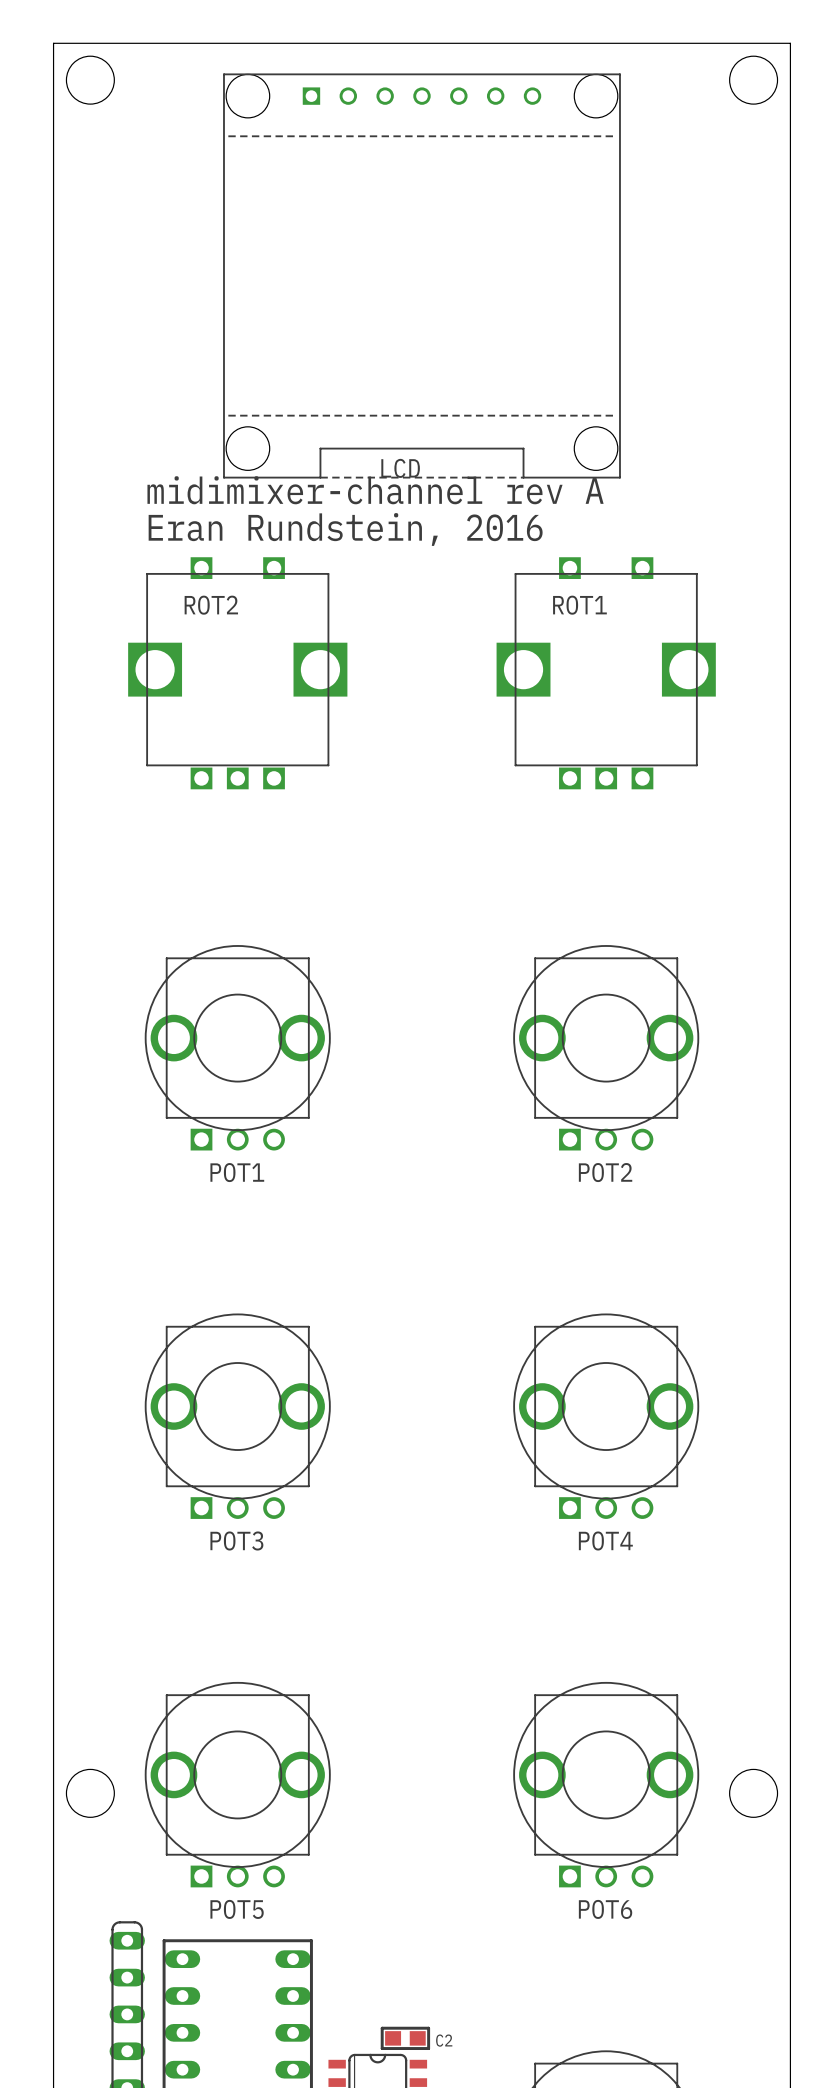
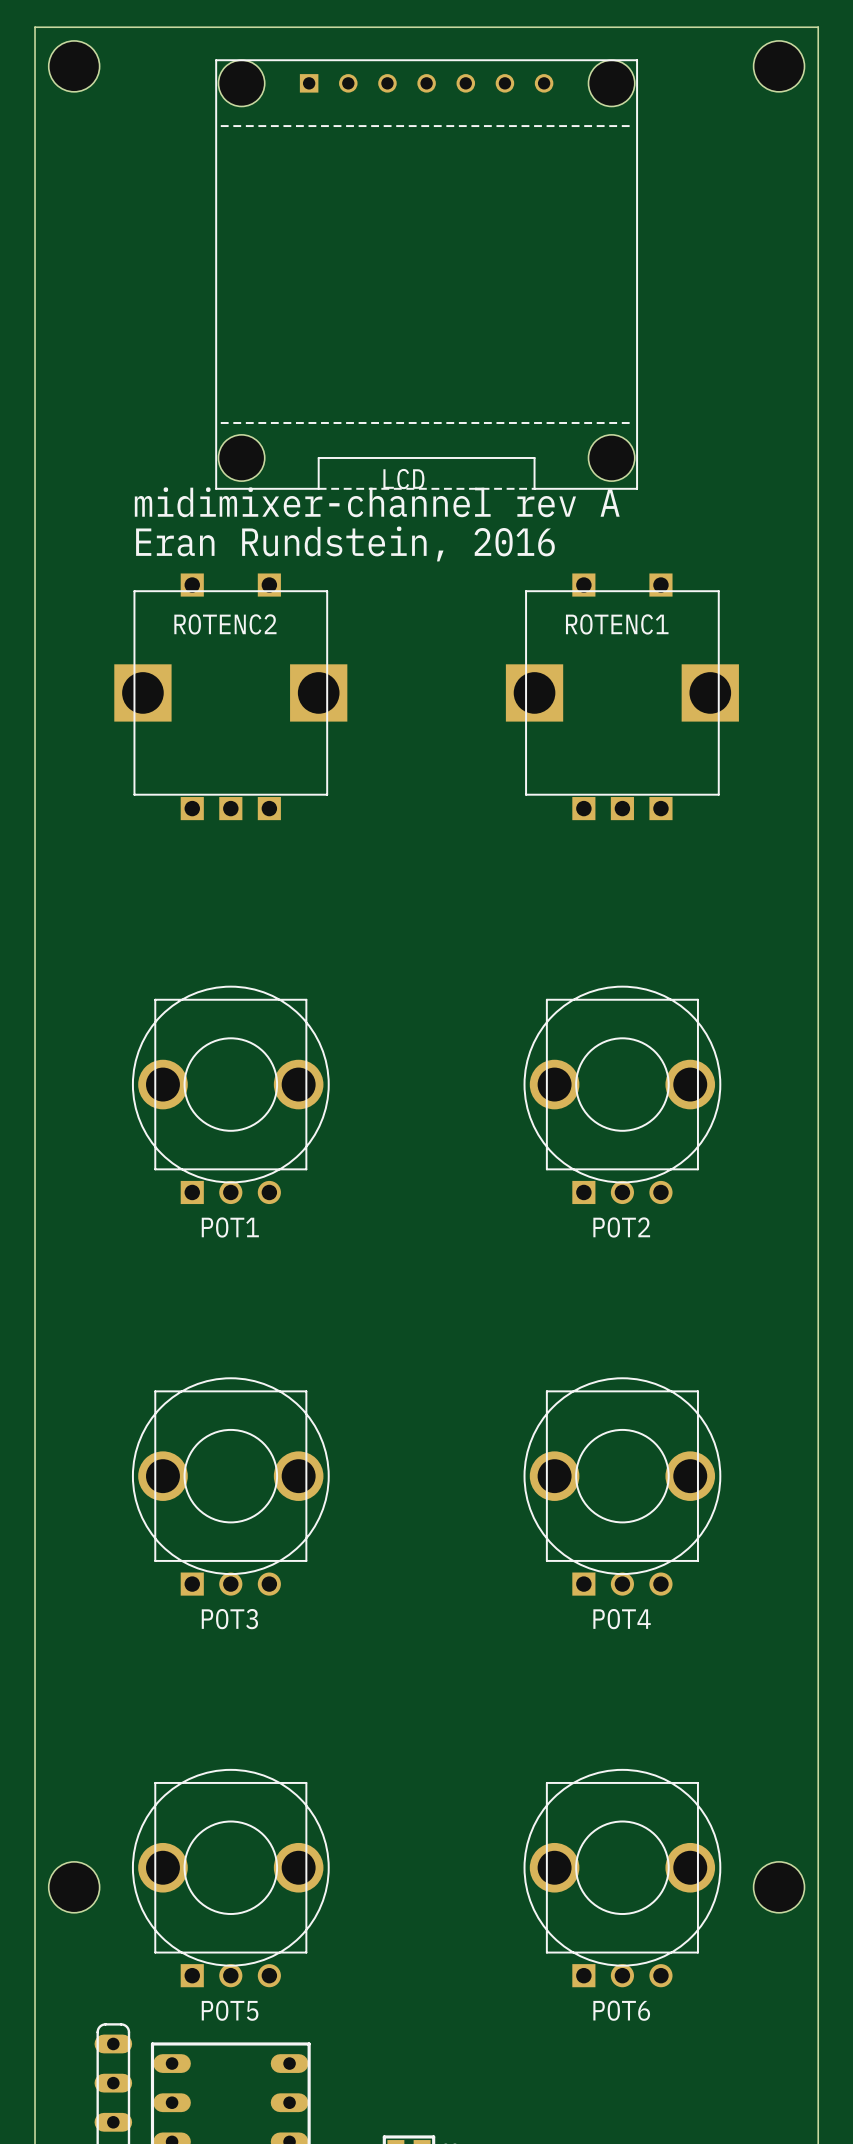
ROT2 name: ROT2 (211, 605) -> ROTENC2 (225, 624)
ROT1 name: ROT1 (579, 605) -> ROTENC1 (617, 624)

